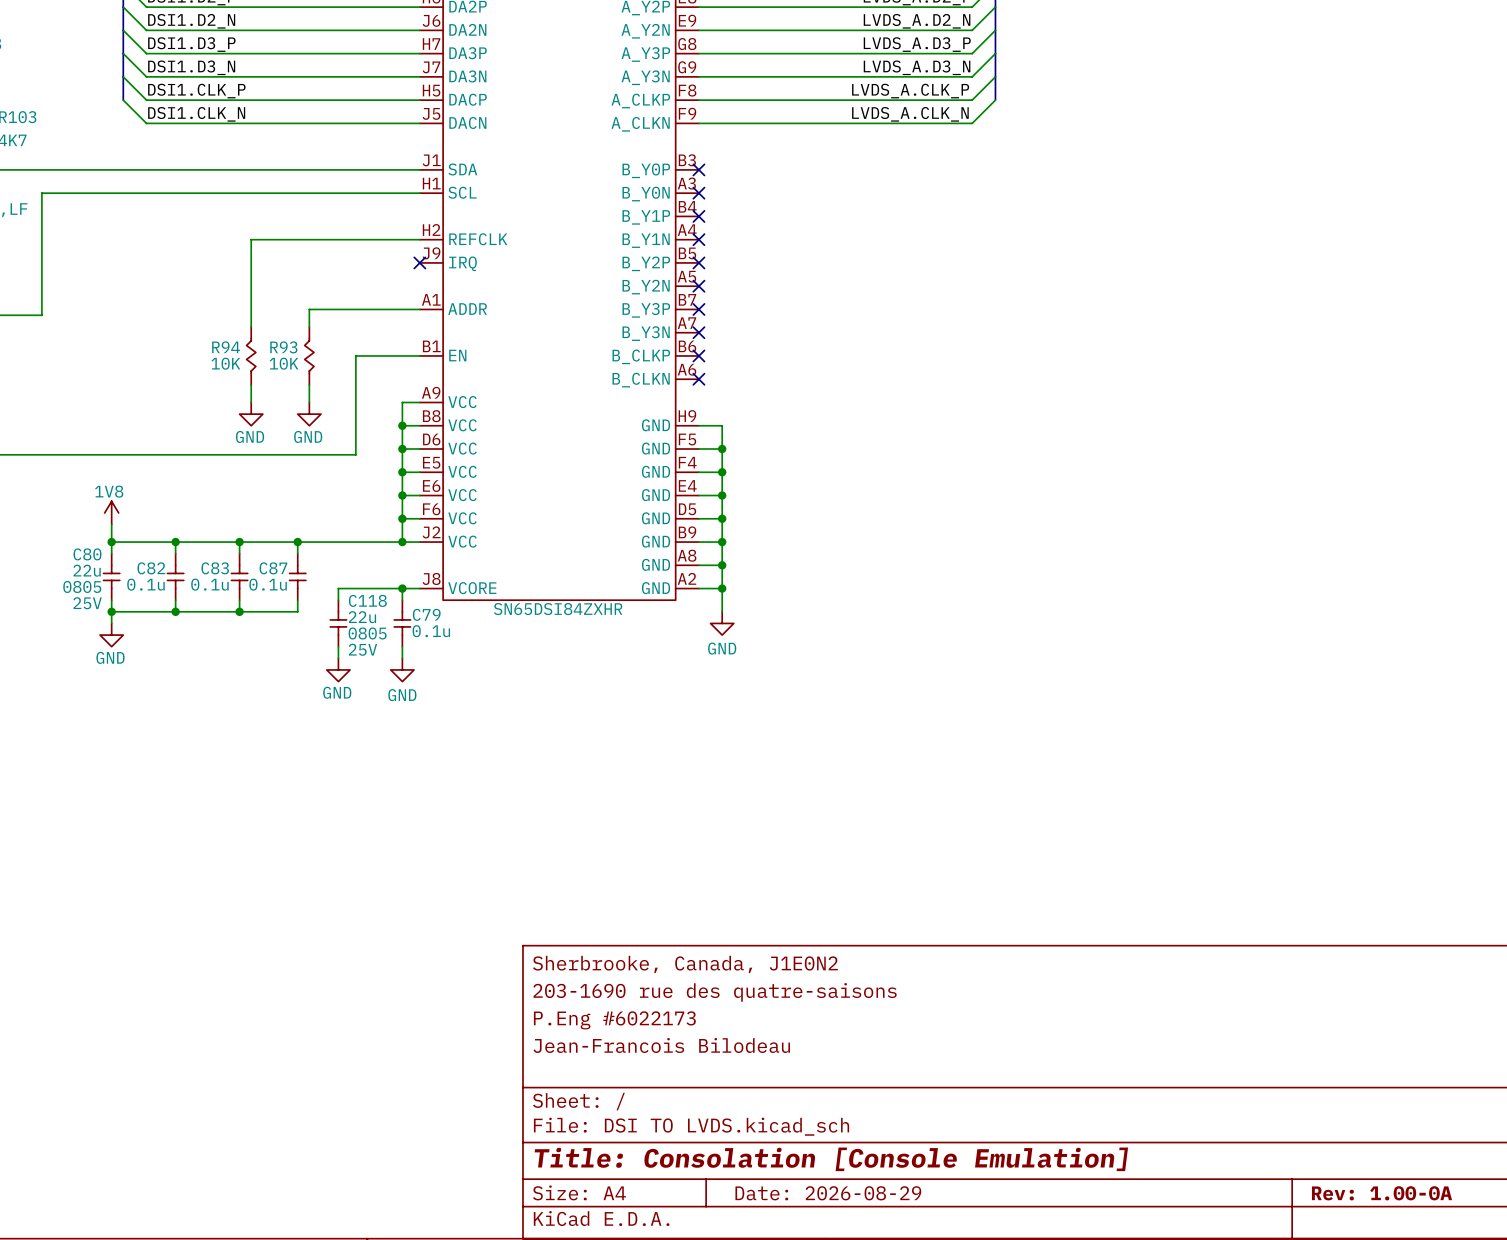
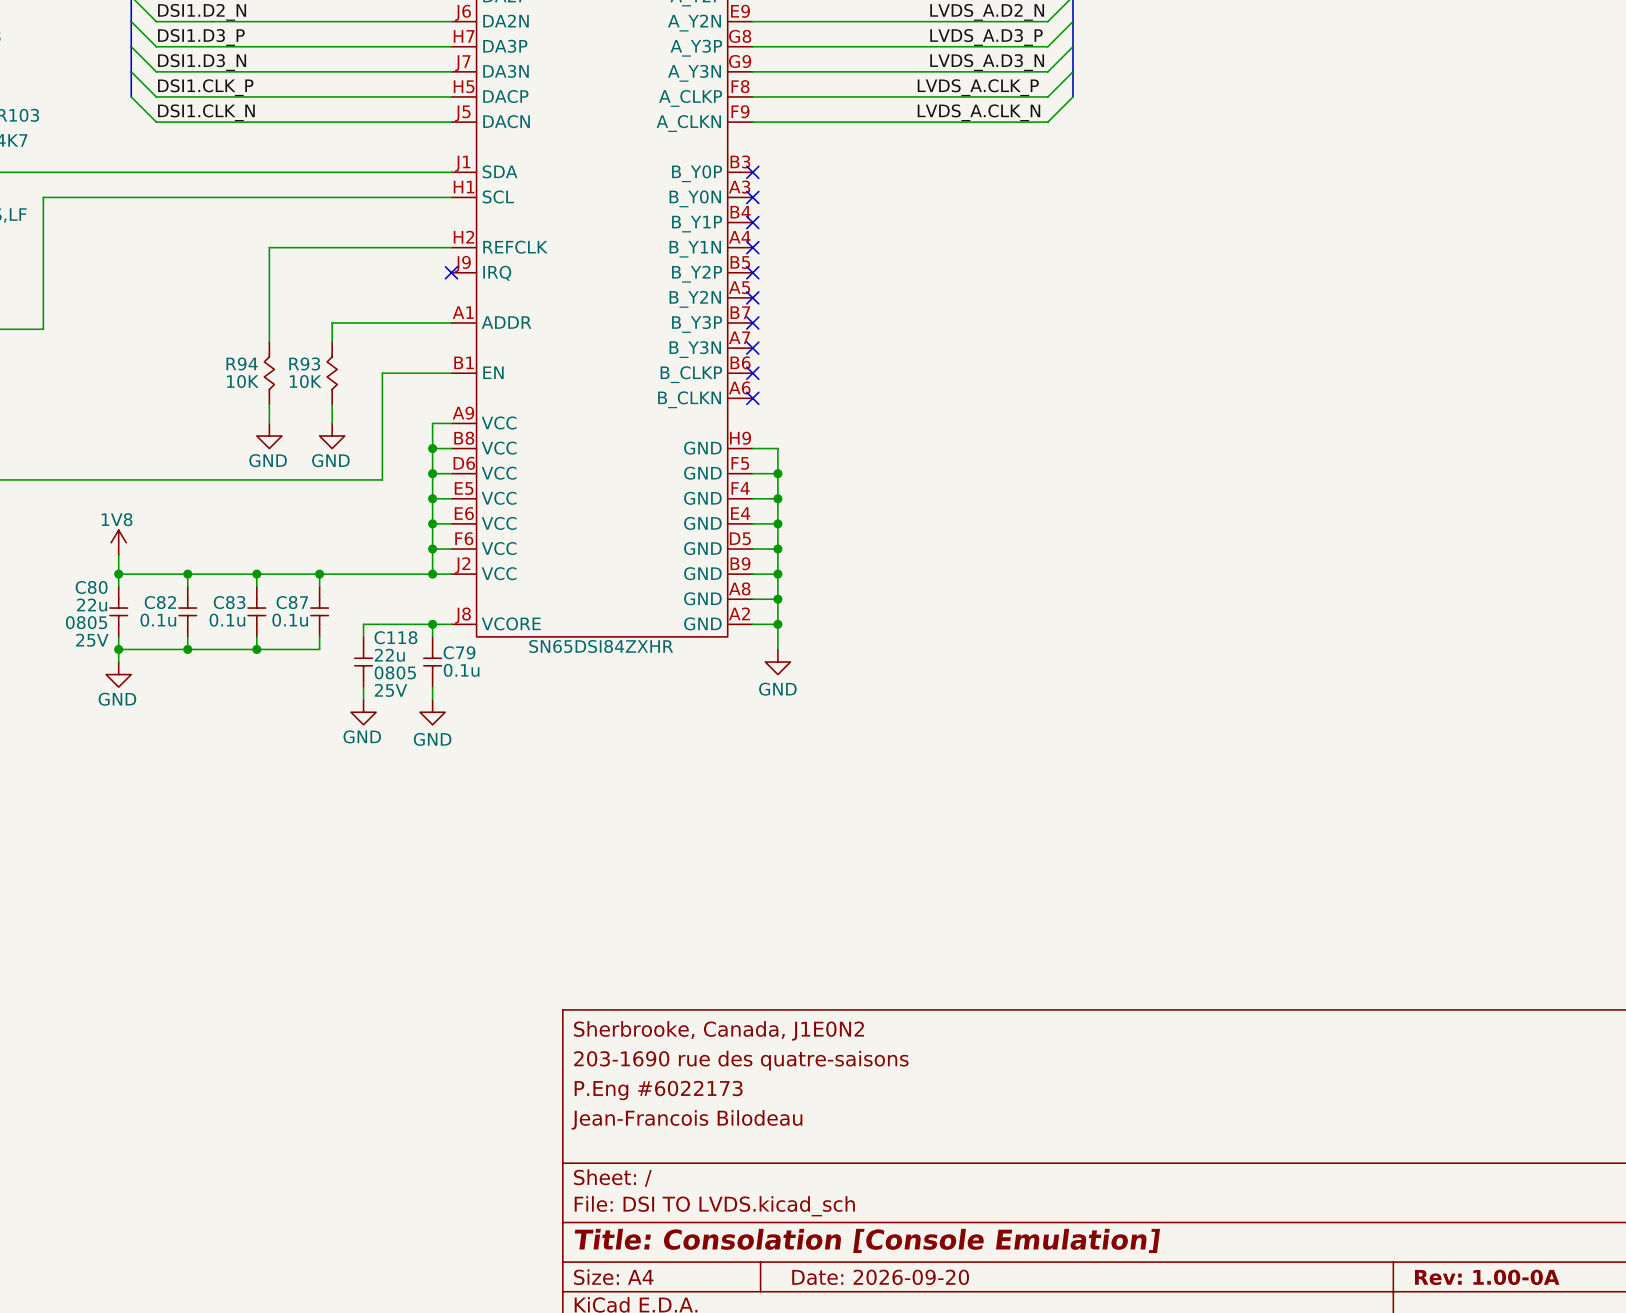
title block: Date: 2026-08-29 (828, 1193) -> Date: 2026-09-20 (880, 1277)

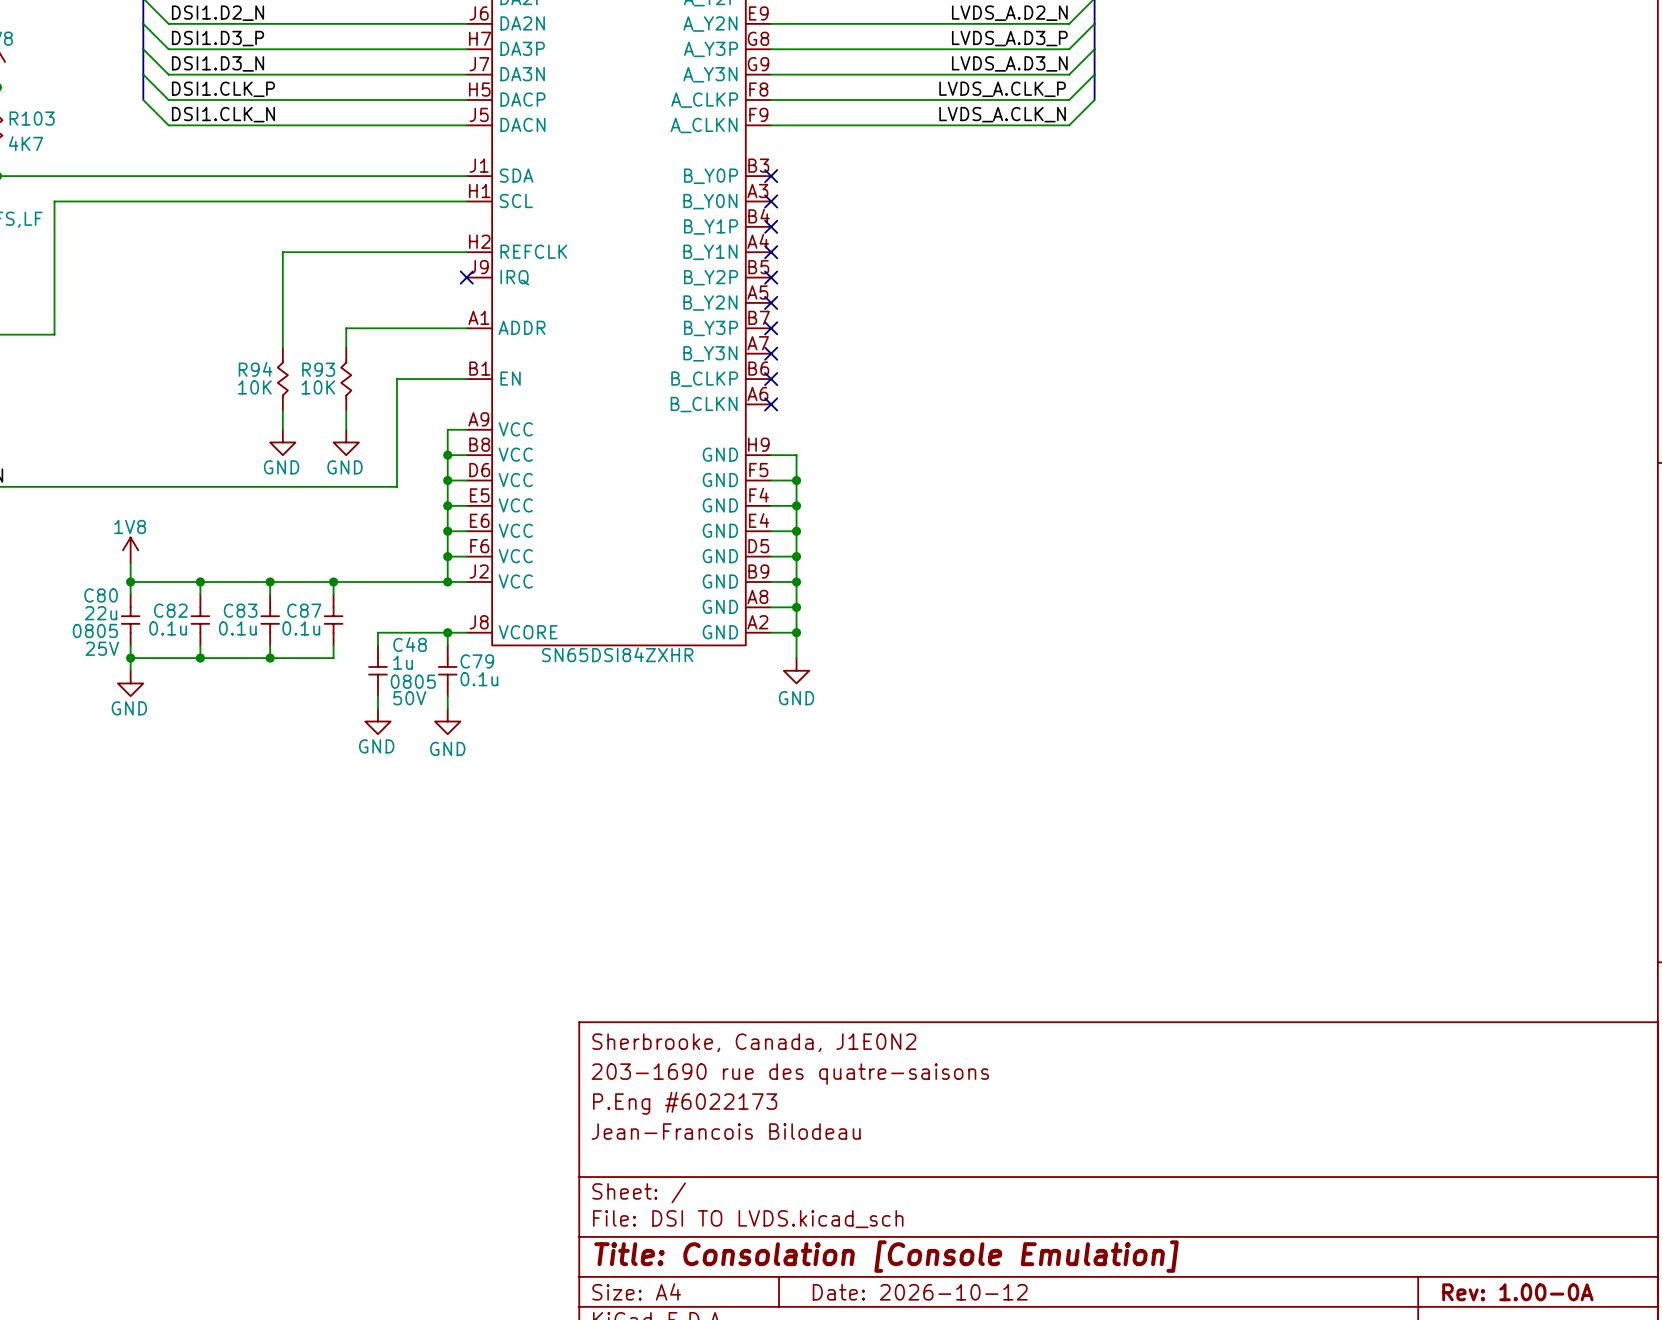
C118 name: C118 (395, 637) -> C48 (410, 644)
C118 value: 22u (389, 655) -> 1u (403, 662)
C118 text: 25V (391, 690) -> 50V (409, 698)
title block: Date: 2026-09-20 (880, 1277) -> Date: 2026-10-12 (920, 1292)

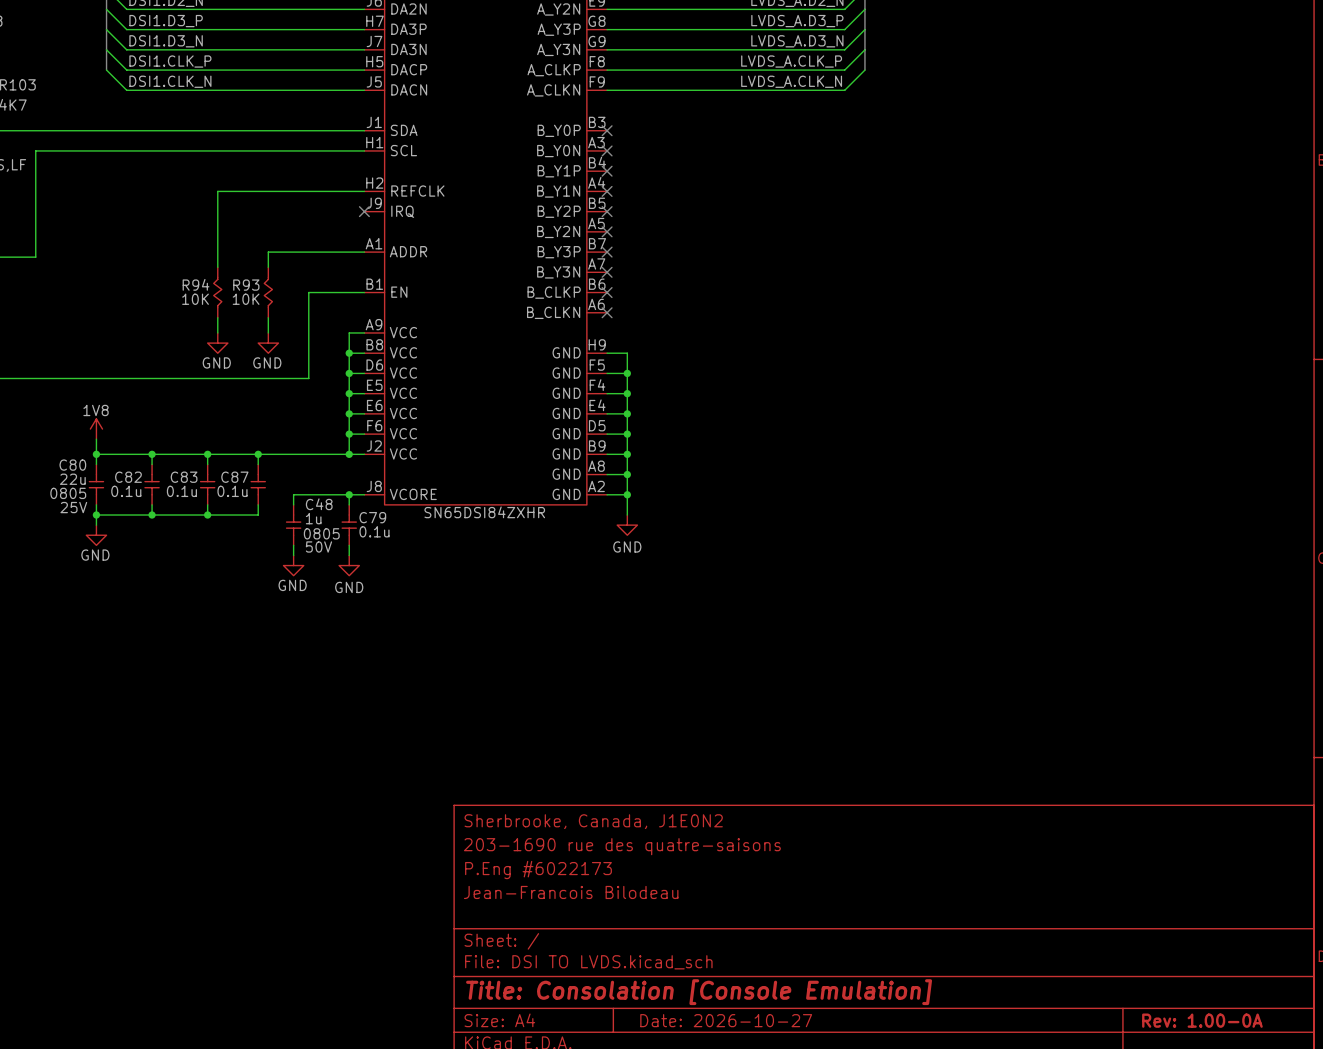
title block: Date: 2026-10-12 (920, 1292) -> Date: 2026-10-27 (726, 1020)

